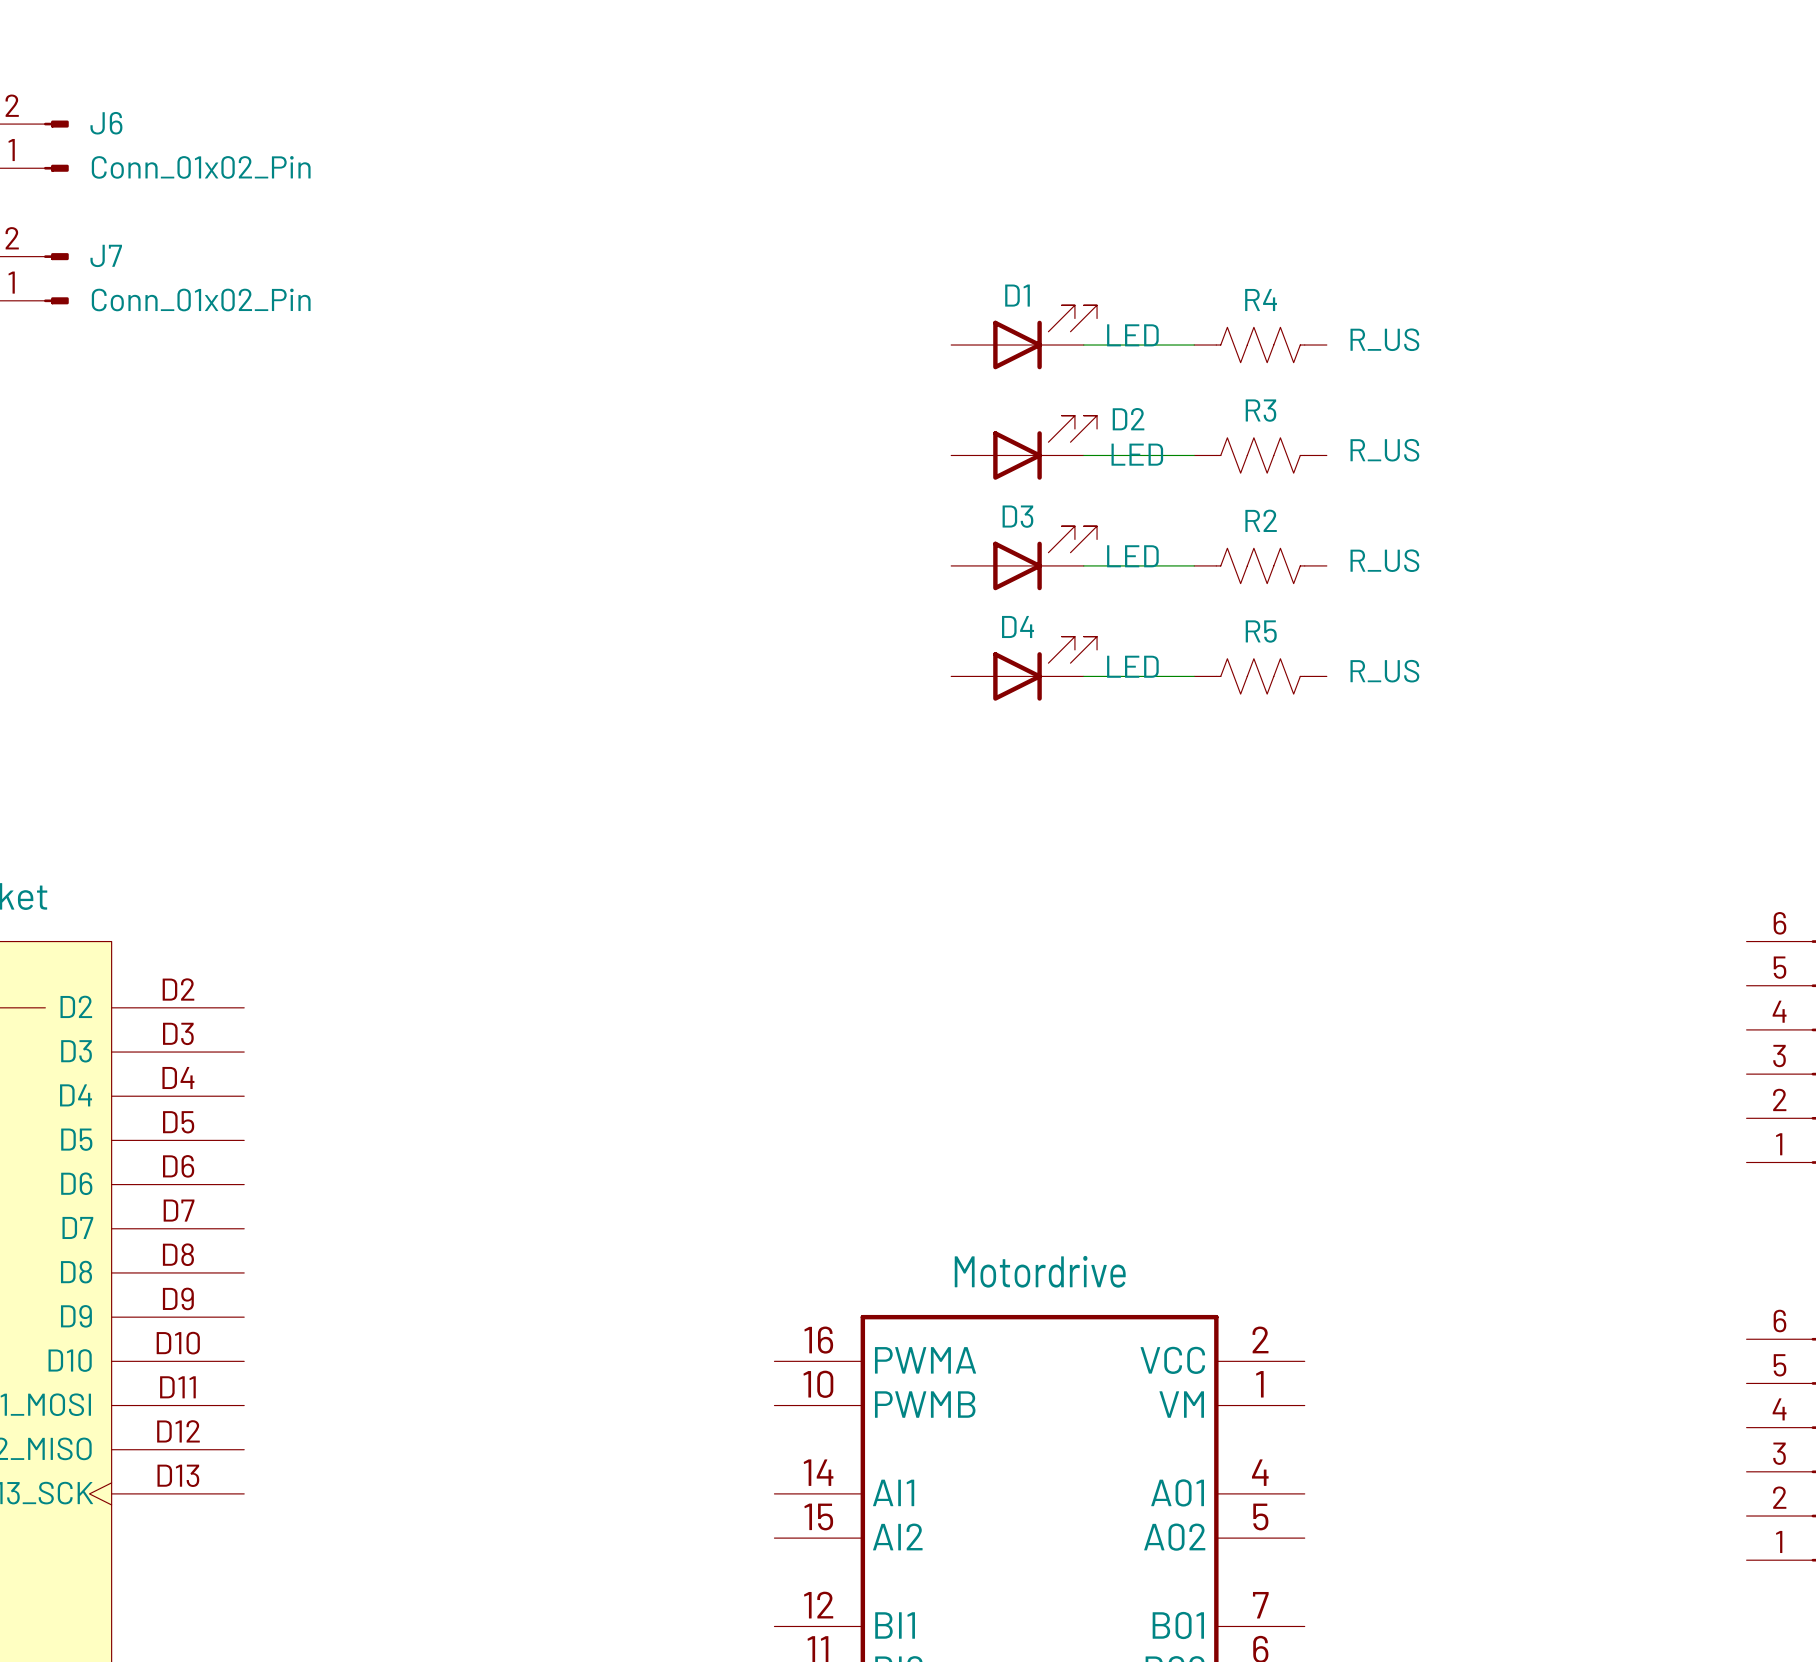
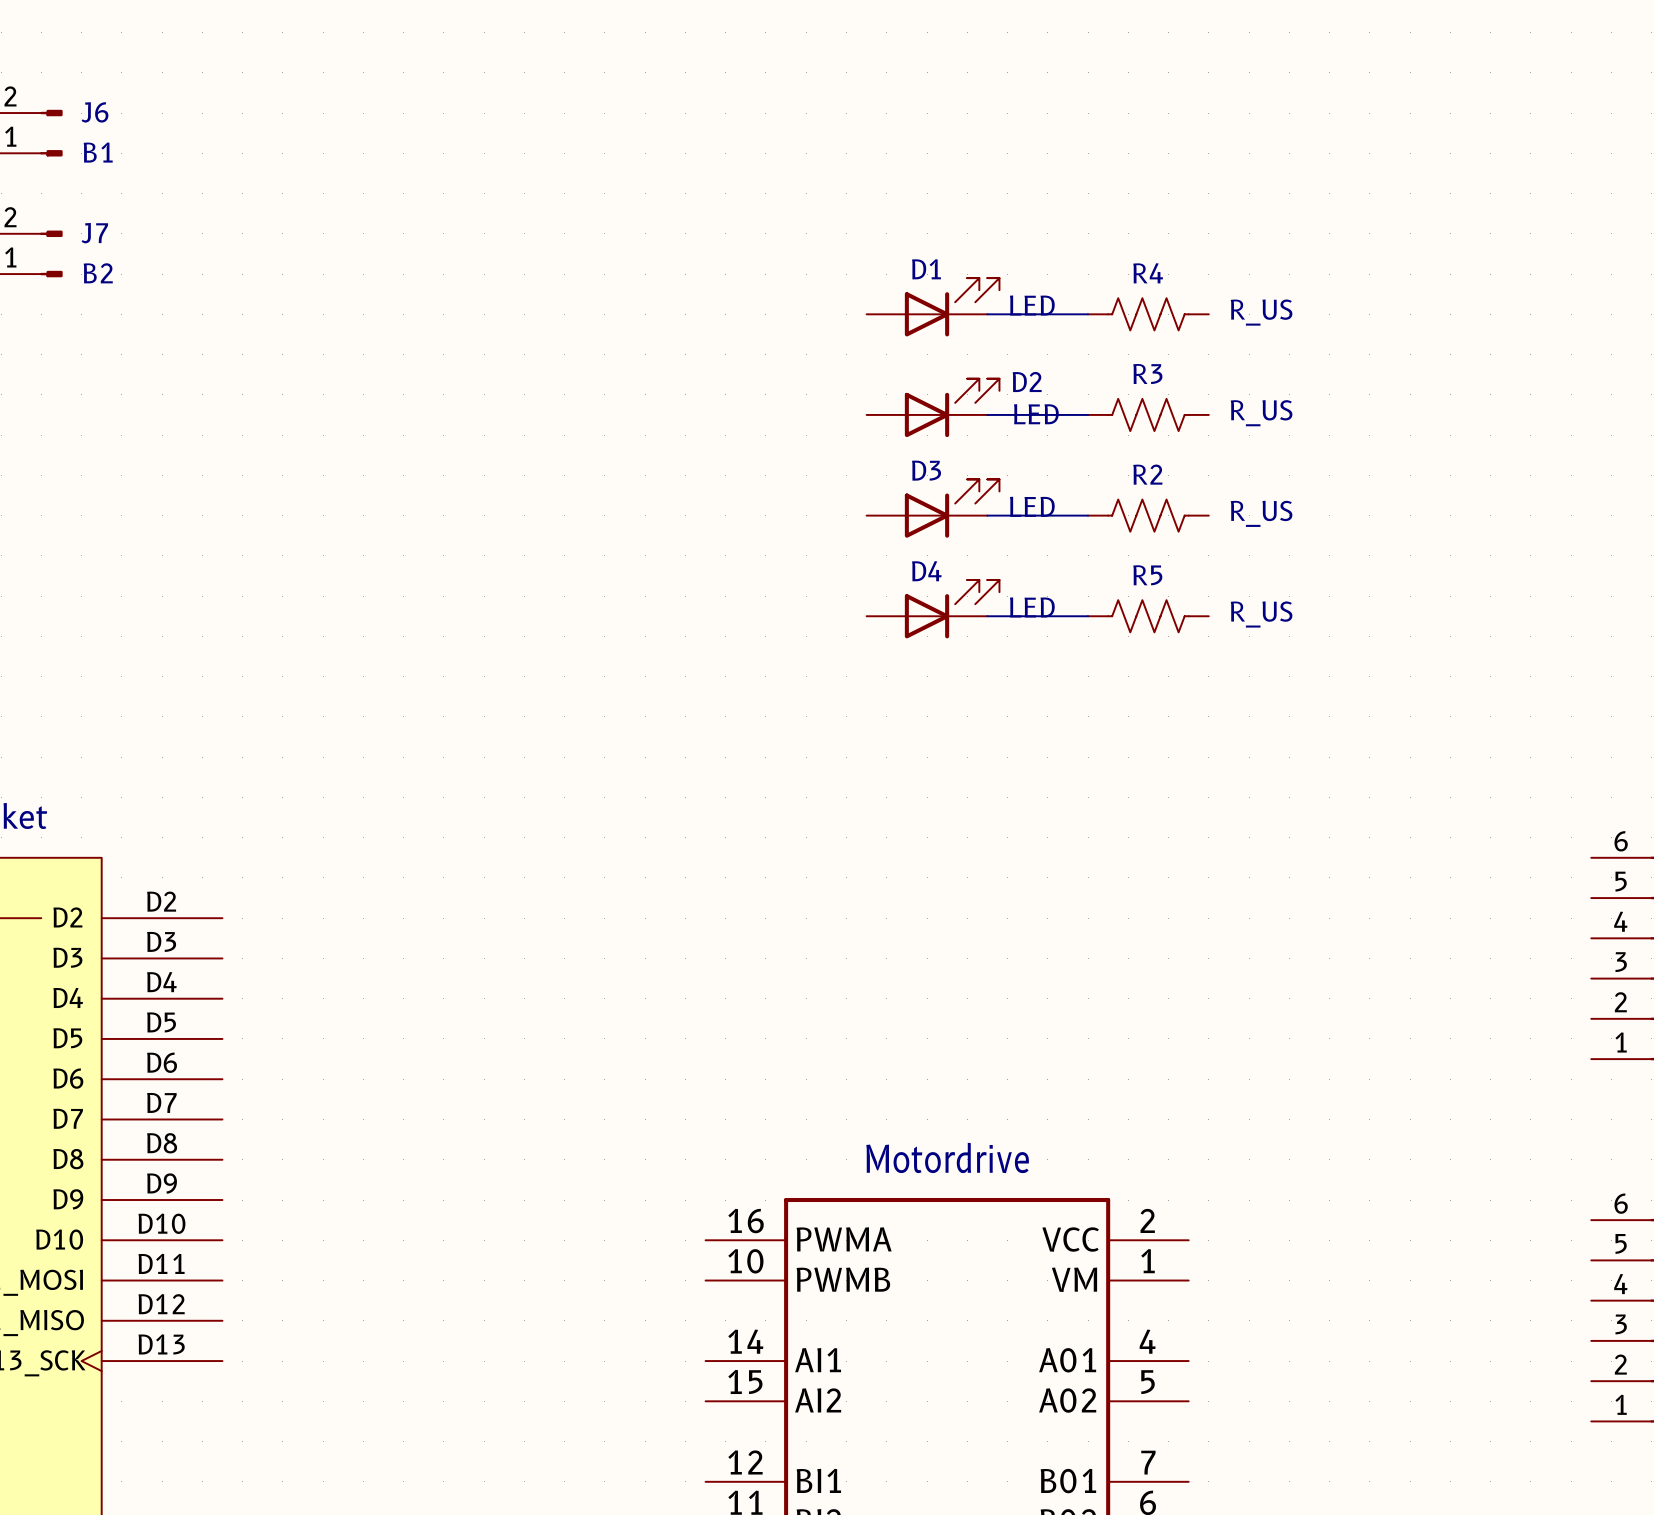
J6 value: Conn_01x02_Pin (201, 167) -> B1 (98, 152)
J7 value: Conn_01x02_Pin (201, 299) -> B2 (98, 273)

